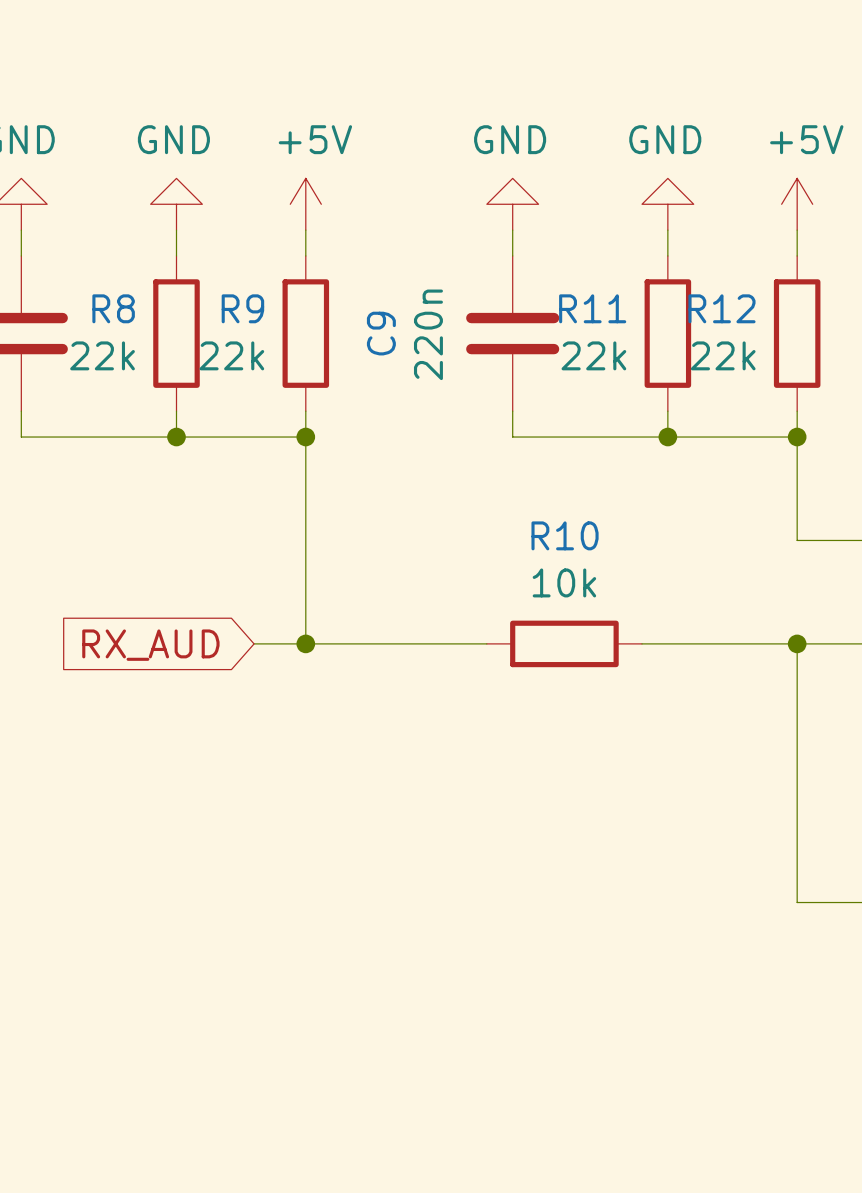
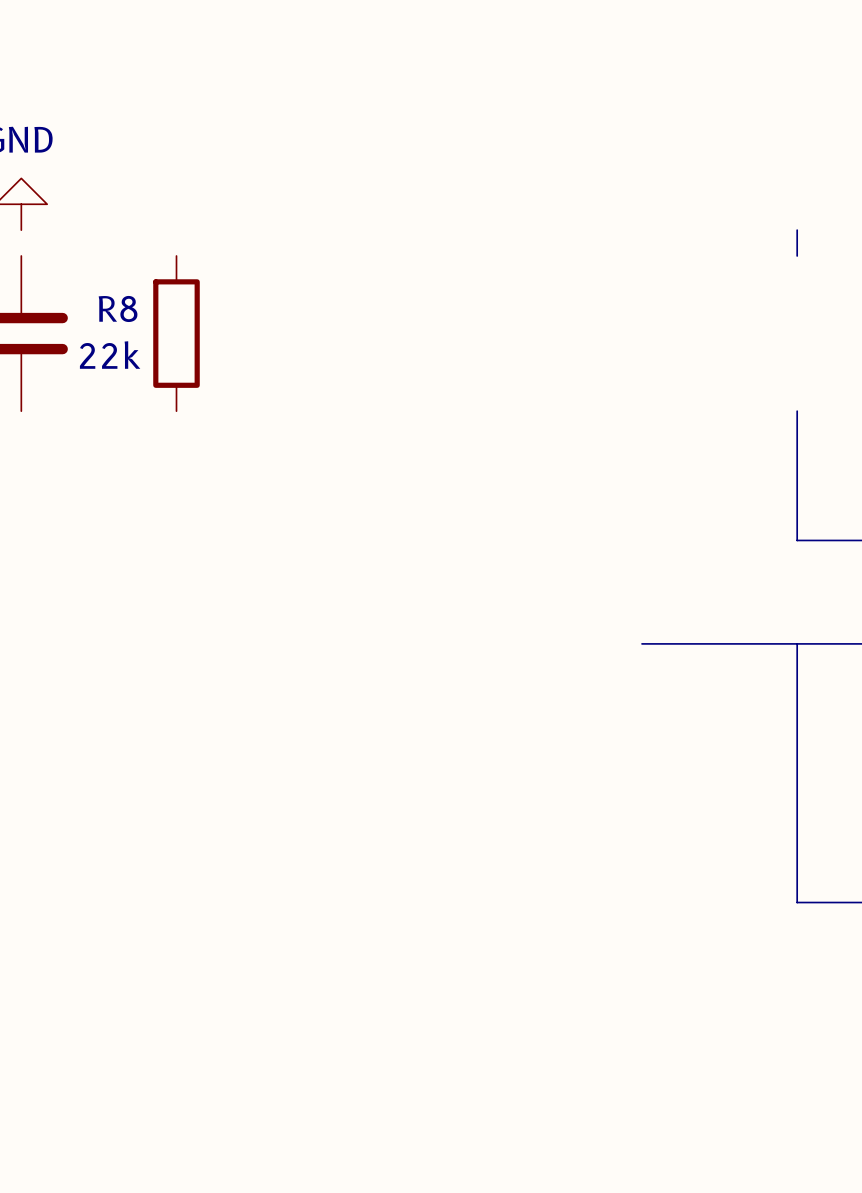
power symbol: GND (176, 204) -> none
power symbol: +5V (305, 204) -> none
power symbol: GND (512, 204) -> none
power symbol: GND (667, 204) -> none
power symbol: +5V (797, 204) -> none
wire: (21, 230) (21, 255) -> none
wire: (176, 230) (176, 255) -> none
wire: (305, 230) (305, 255) -> none
wire: (512, 230) (512, 255) -> none
wire: (667, 230) (667, 255) -> none
R9: 22k (305, 333) -> none
C9: 220n (512, 333) -> none
R11: 22k (667, 333) -> none
R12: 22k (797, 333) -> none
wire: (21, 411) (21, 437) (305, 437) -> none
wire: (176, 411) (176, 437) -> none
wire: (305, 411) (305, 643) -> none
wire: (512, 411) (512, 437) (797, 437) -> none
wire: (667, 411) (667, 437) -> none
junction: (176, 437) -> none
junction: (305, 437) -> none
junction: (667, 437) -> none
junction: (797, 437) -> none
wire: (254, 643) (486, 643) -> none
junction: (305, 643) -> none
R10: 10k (564, 643) -> none
junction: (797, 643) -> none
global label: RX_AUD (150, 645) -> none

